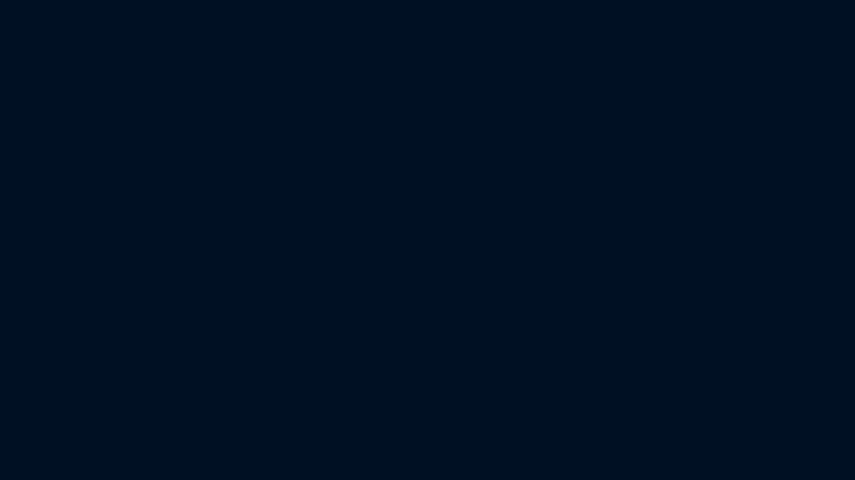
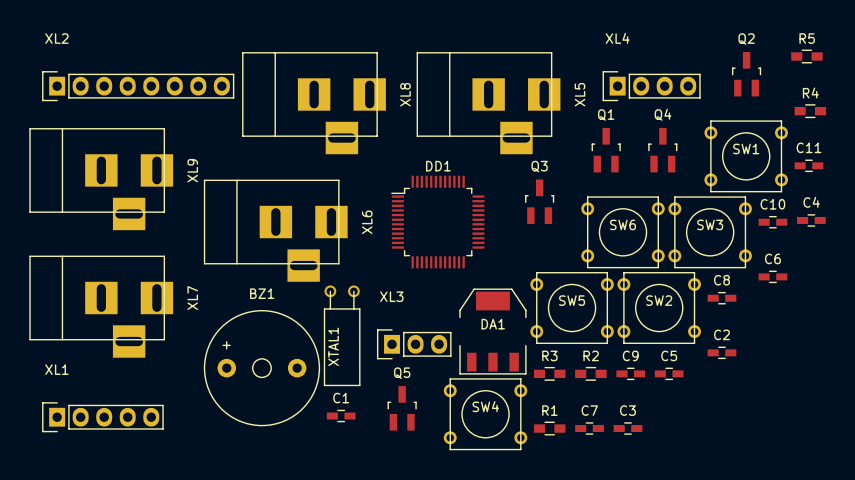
R5: none -> (806, 56)
Q2: none -> (746, 74)
XL2: none -> (138, 86)
XL4: none -> (651, 86)
XL8: none -> (314, 103)
XL5: none -> (488, 103)
R4: none -> (810, 111)
Q1: none -> (606, 150)
Q4: none -> (662, 150)
SW1: none -> (746, 156)
C11: none -> (808, 165)
XL9: none -> (101, 179)
Q3: none -> (539, 201)
C4: none -> (811, 220)
DD1: none -> (437, 222)
C10: none -> (772, 222)
XL6: none -> (275, 230)
SW6: none -> (622, 232)
SW3: none -> (710, 232)
C6: none -> (772, 276)
C8: none -> (721, 298)
XL7: none -> (101, 306)
SW5: none -> (572, 308)
SW2: none -> (659, 308)
DA1: none -> (492, 331)
XTAL1: none -> (342, 335)
XL3: none -> (414, 344)
C2: none -> (721, 352)
BZ1: none -> (261, 368)
R3: none -> (549, 373)
R2: none -> (590, 373)
C9: none -> (630, 373)
C5: none -> (669, 373)
Q5: none -> (402, 408)
SW4: none -> (485, 414)
C1: none -> (341, 416)
XL1: none -> (102, 417)
R1: none -> (549, 428)
C7: none -> (589, 428)
C3: none -> (627, 428)

